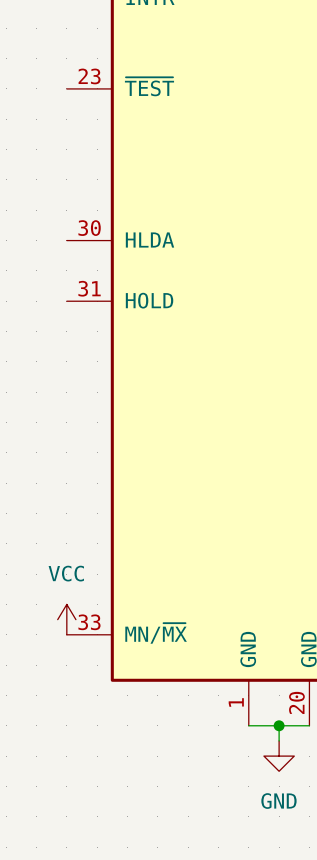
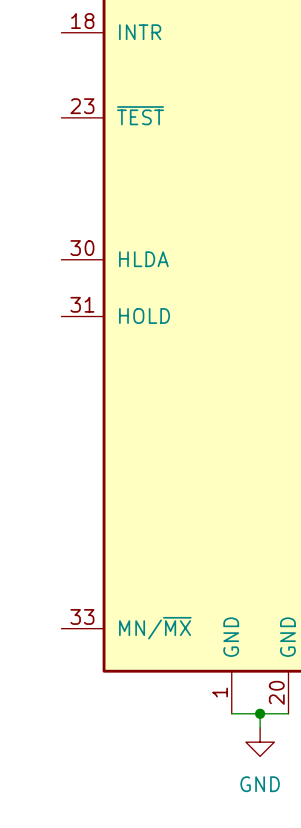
power symbol: VCC (66, 619) -> none

